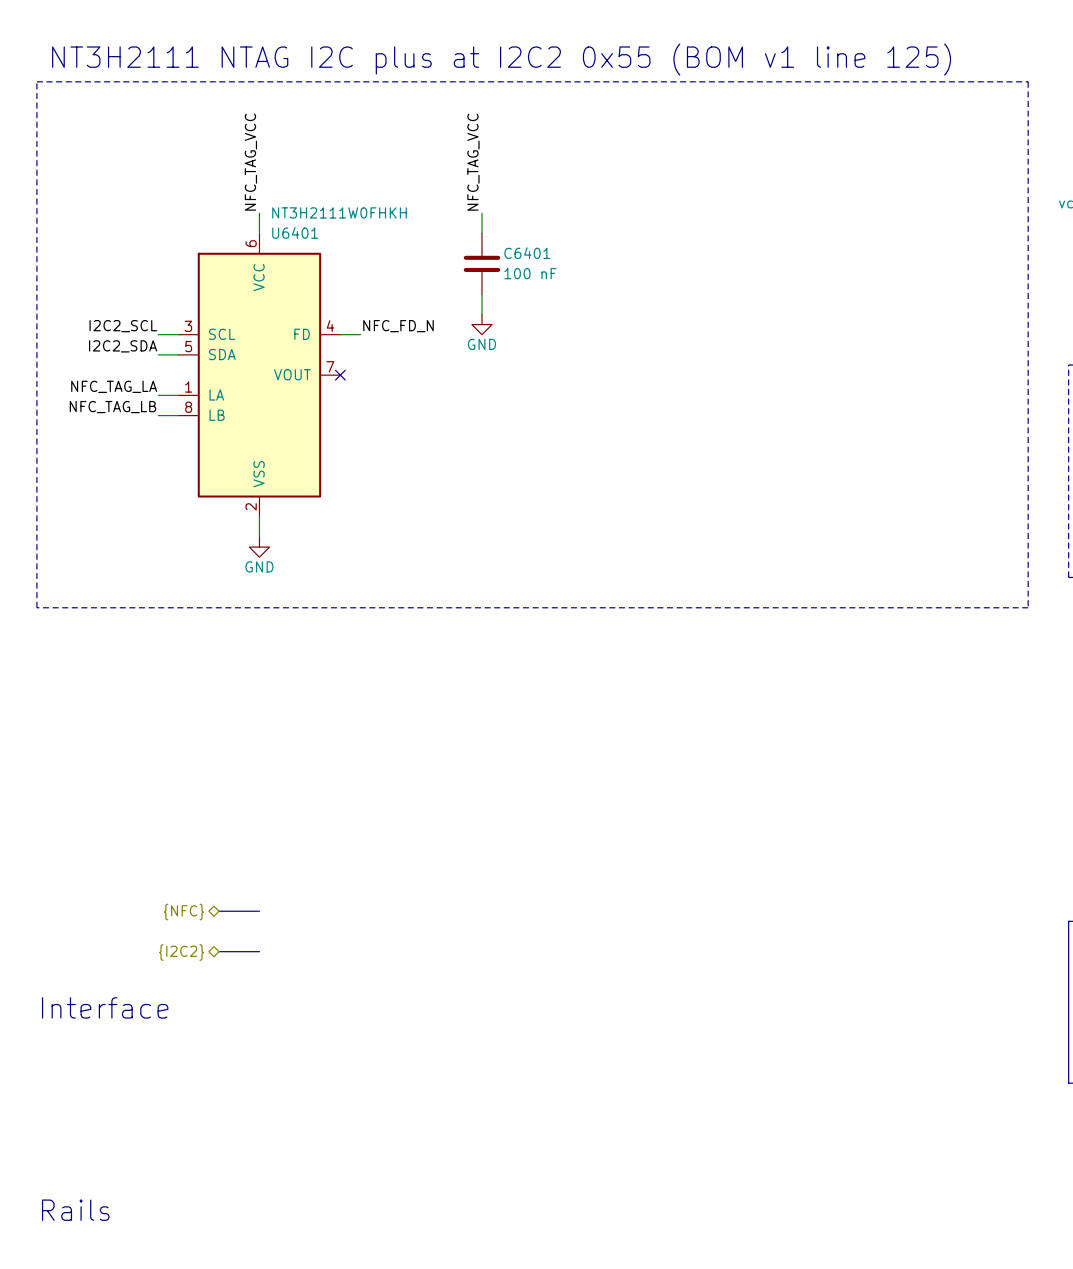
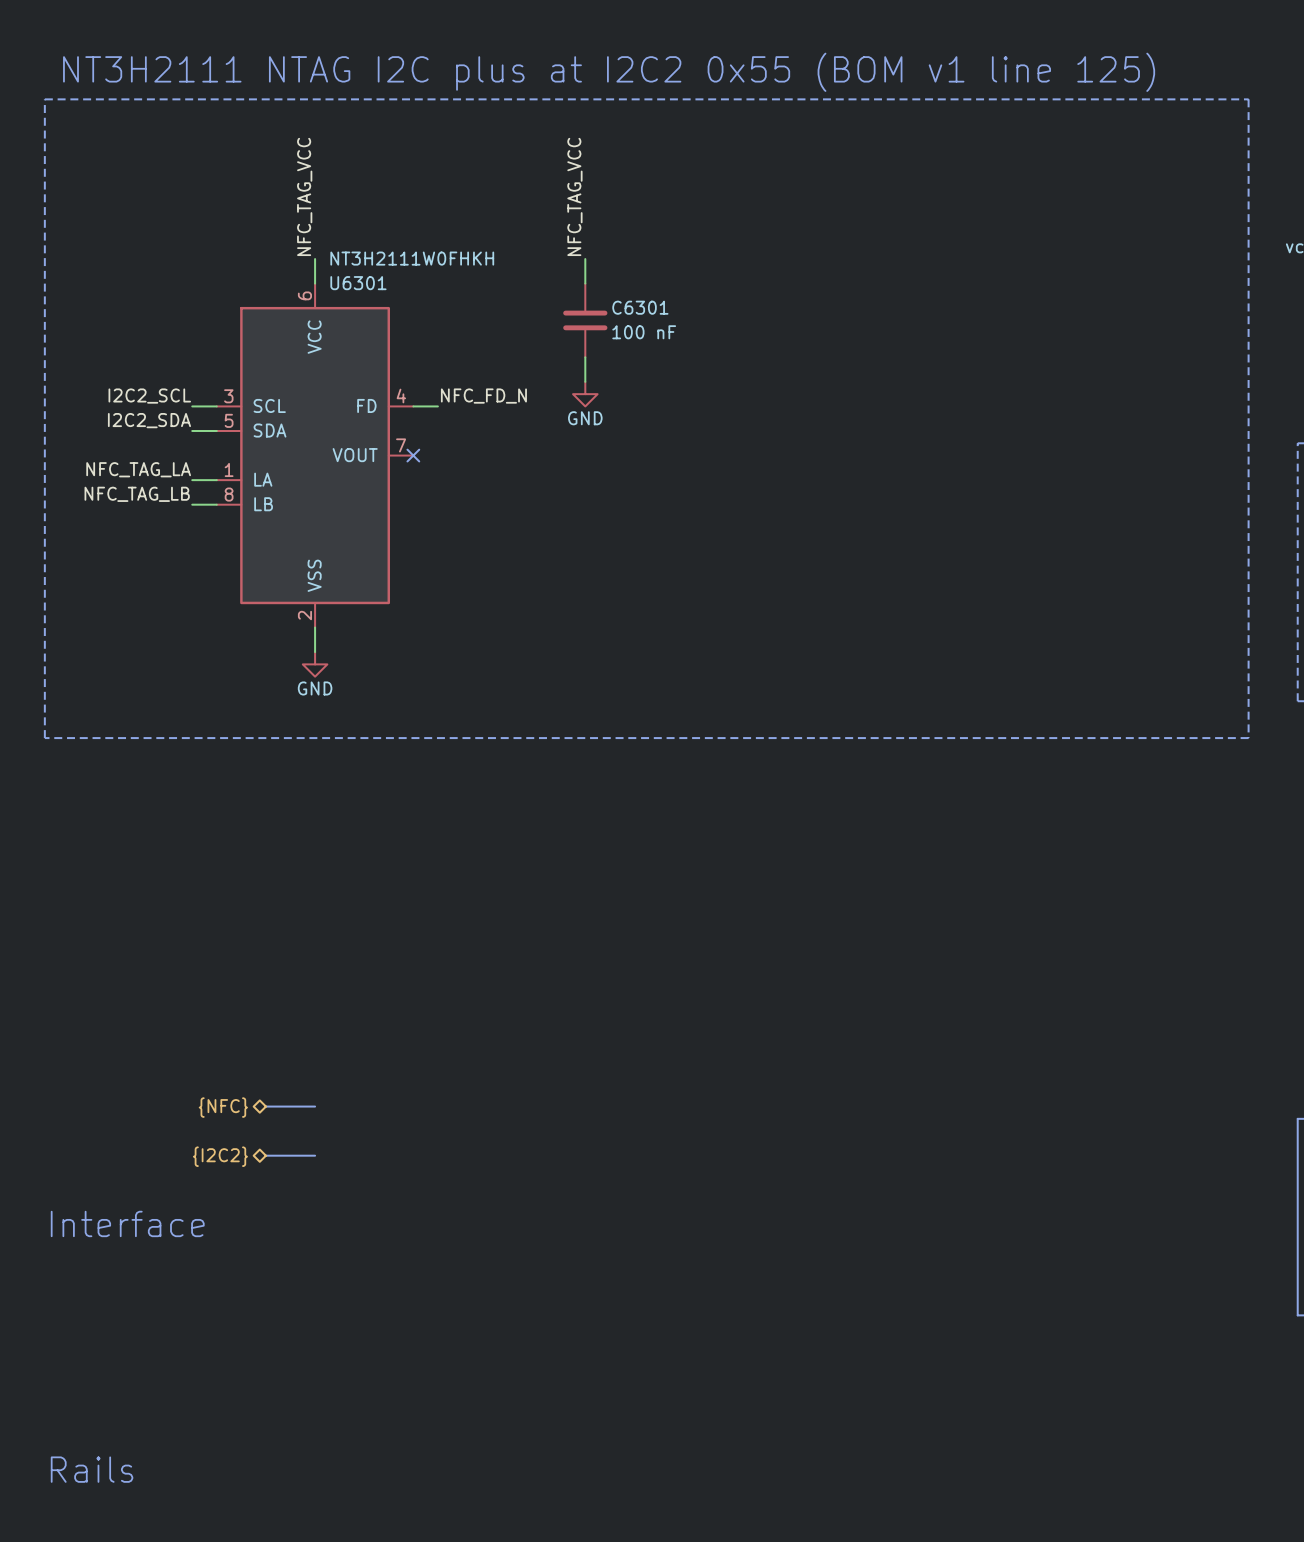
U6401 name: U6401 (295, 232) -> U6301 (358, 283)
C6401 name: C6401 (527, 253) -> C6301 (640, 307)

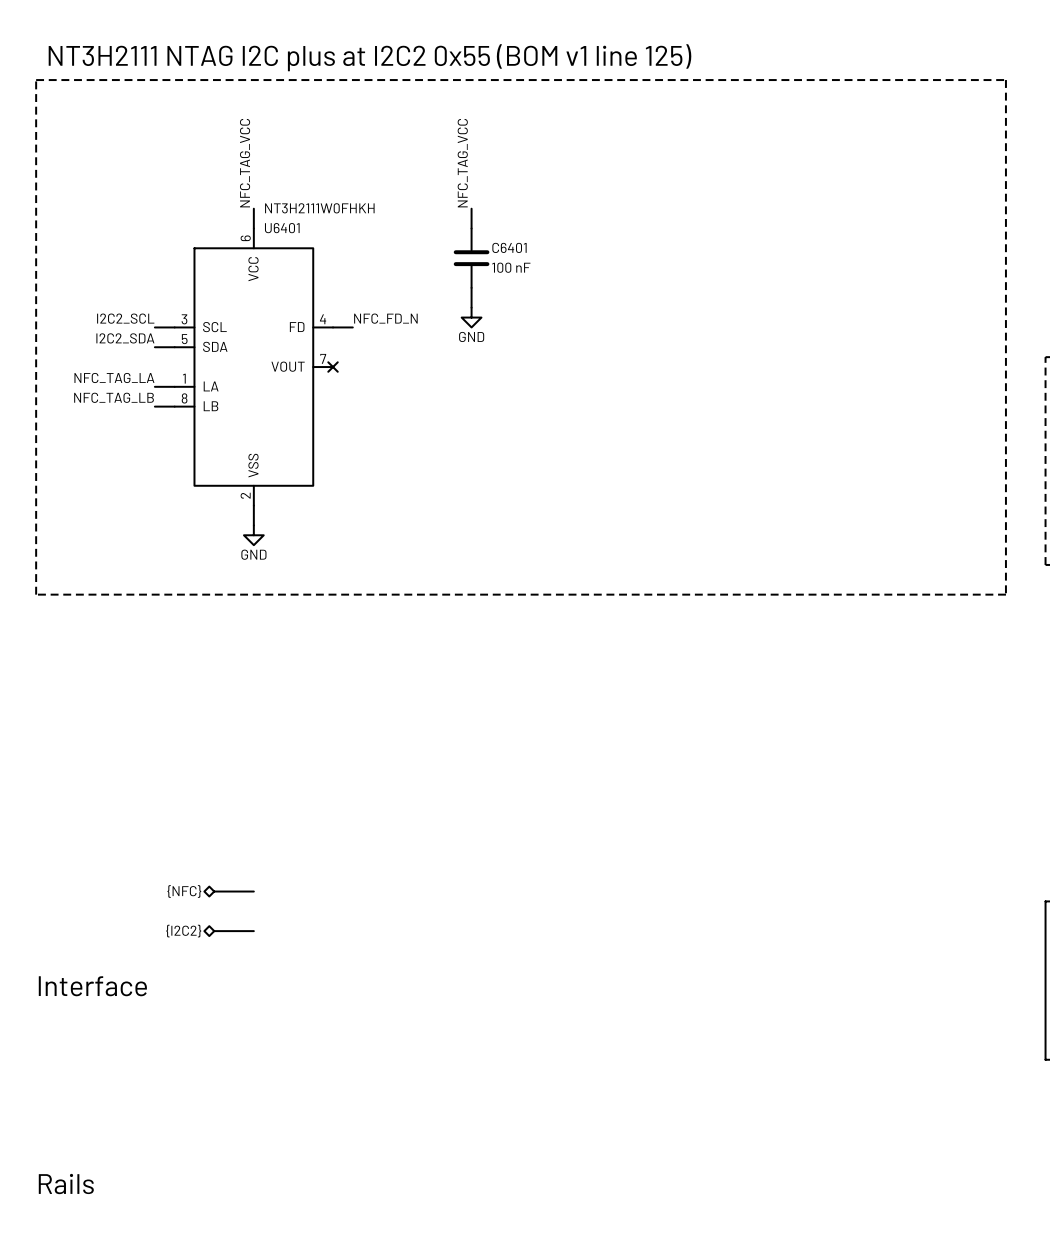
U6301 name: U6301 (358, 283) -> U6401 (282, 228)
C6301 name: C6301 (640, 307) -> C6401 (509, 247)

